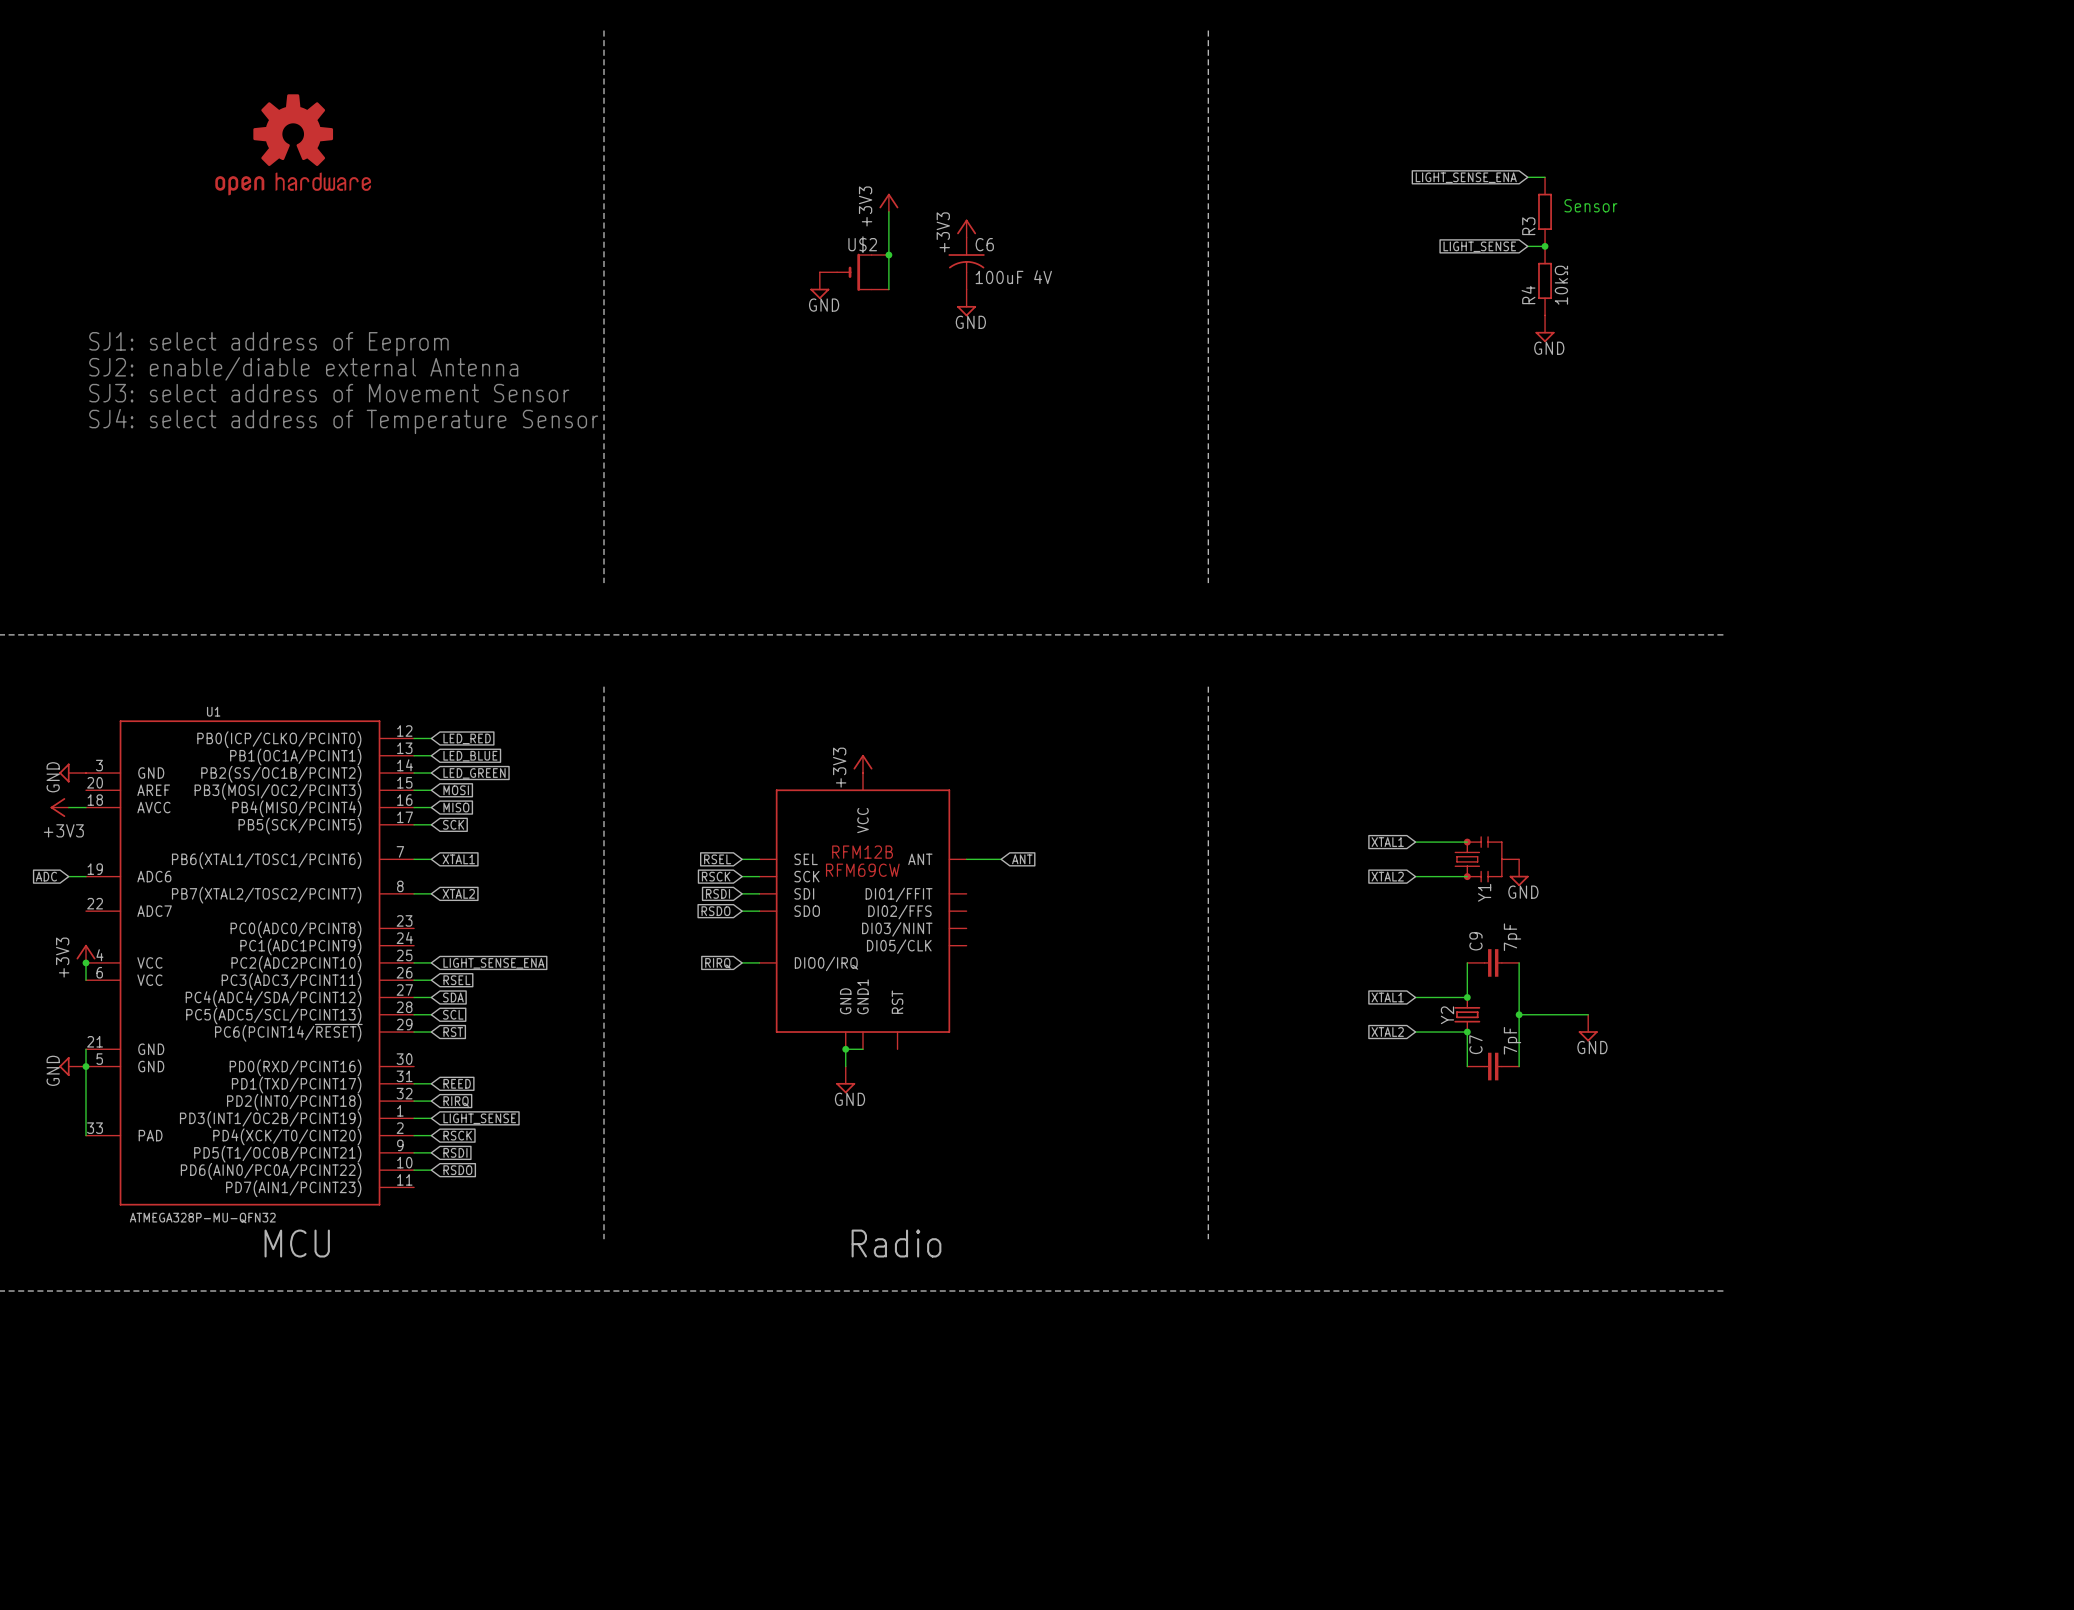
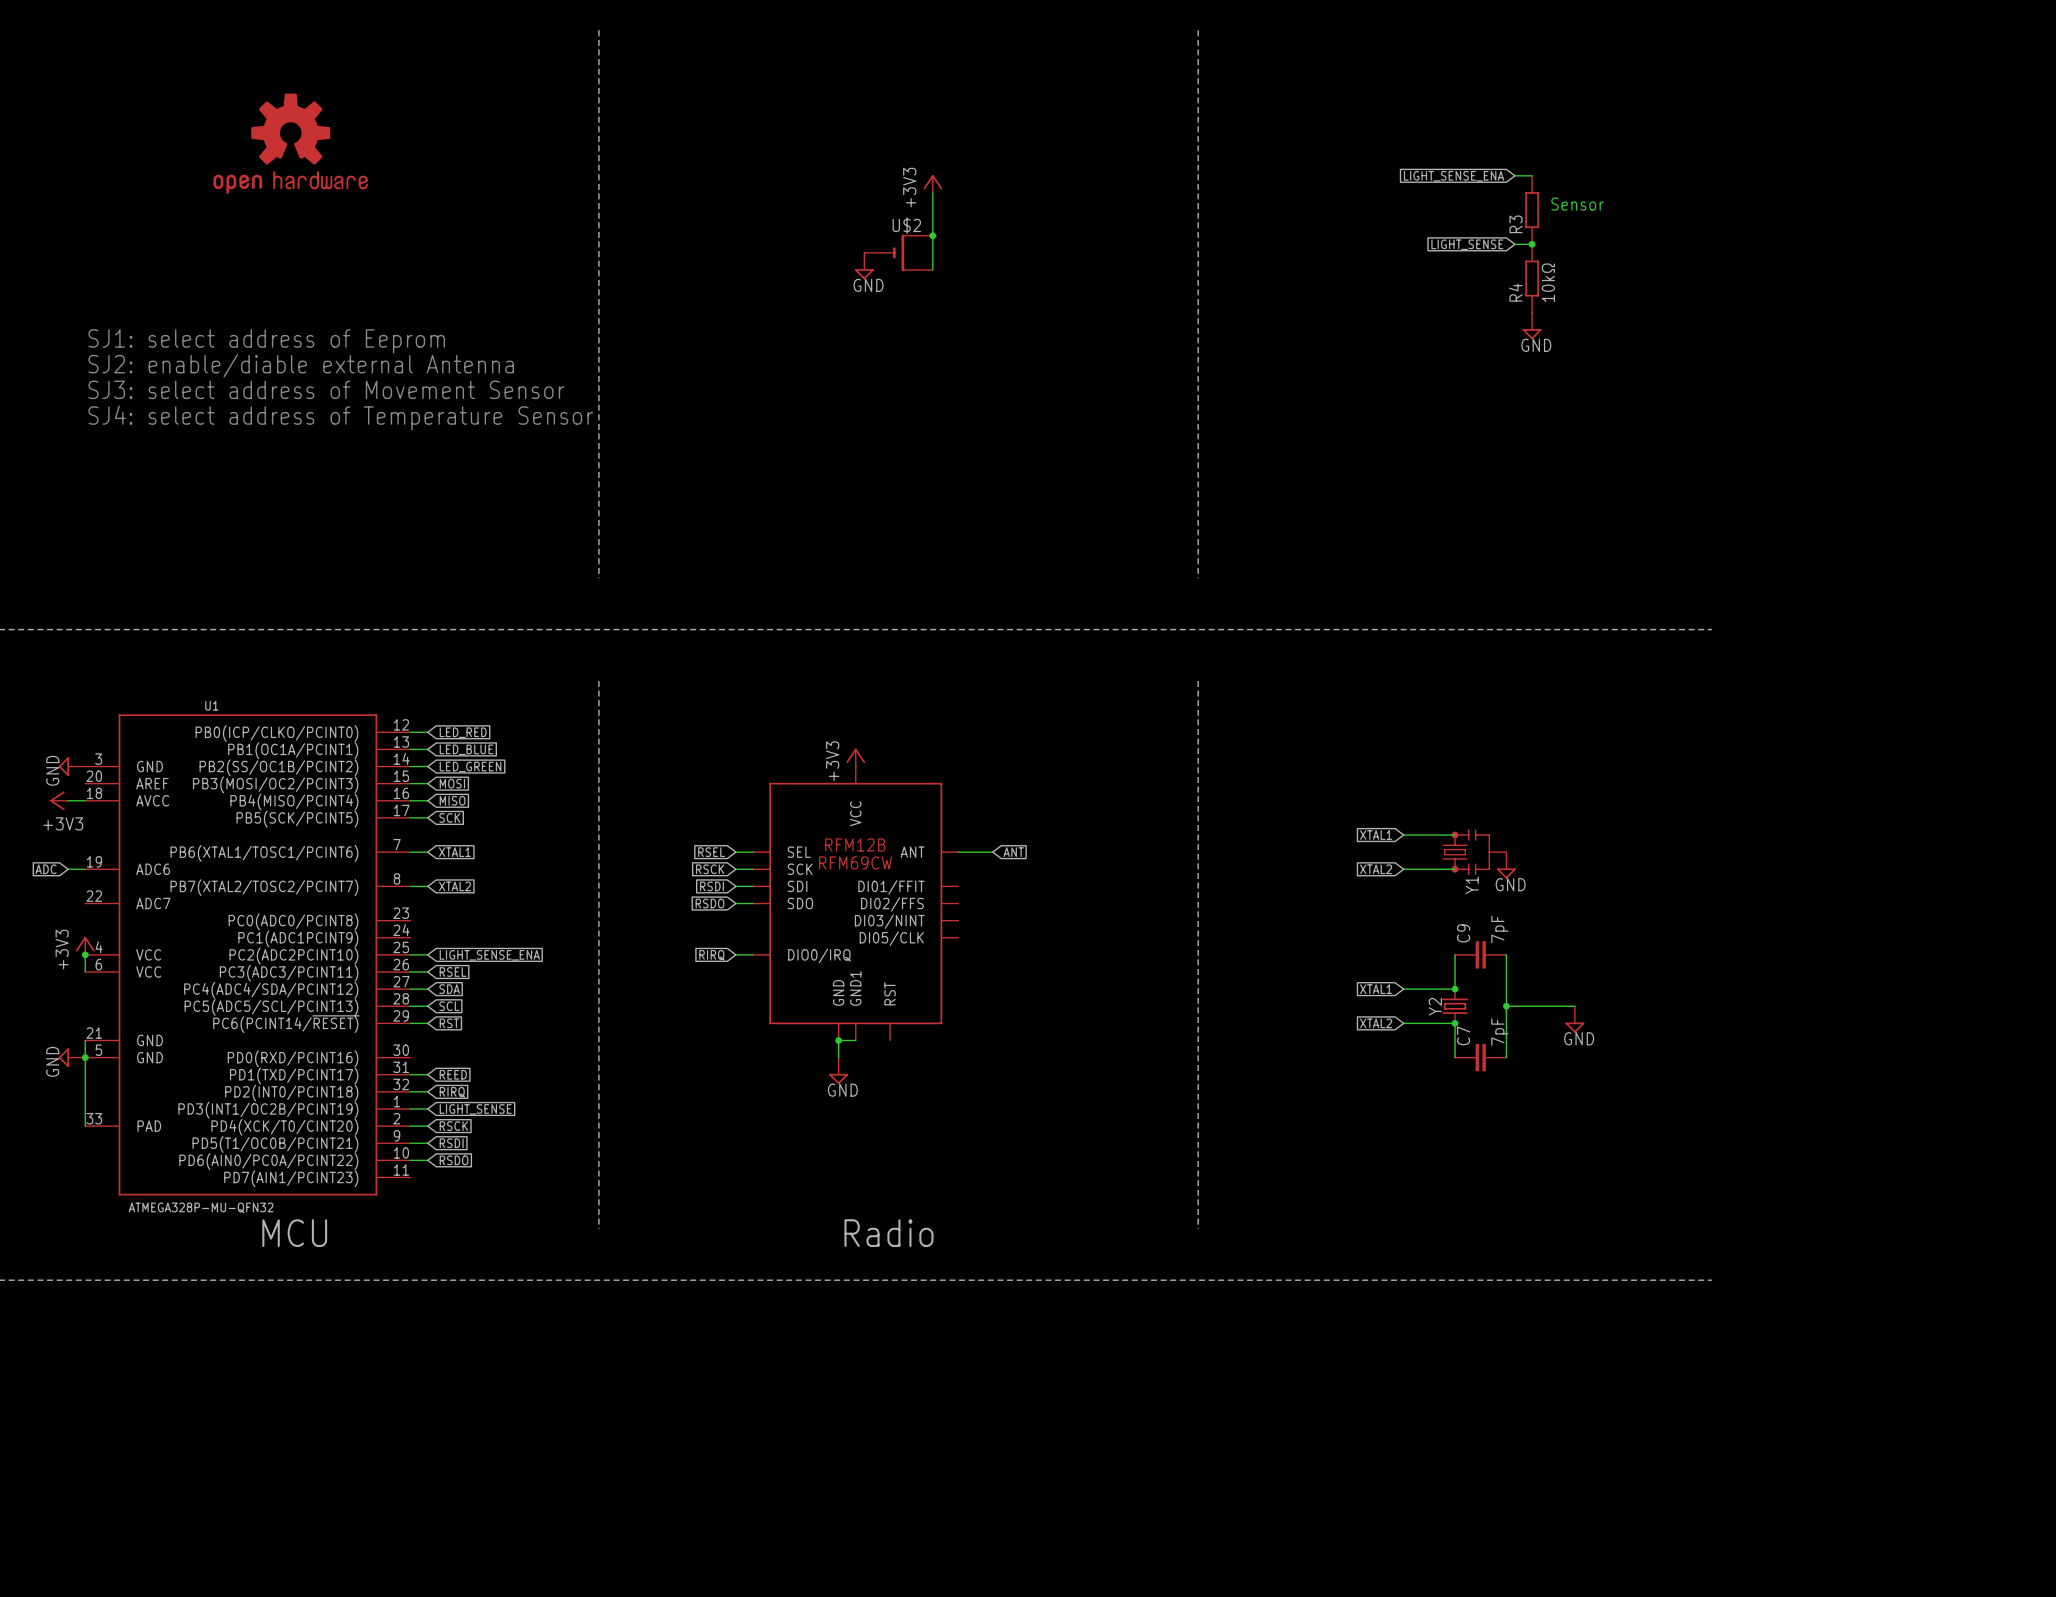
power symbol: none -> +3V3 (932, 183)
power symbol: +3V3 (888, 202) -> none
wire: (888, 211) (888, 289) -> (932, 192) (932, 270)
power symbol: +3V3 (966, 228) -> none
junction: none -> (932, 235)
junction: (888, 255) -> none
C6: 100uF 4V (966, 263) -> none
power symbol: none -> GND (864, 266)
U$2 position: (854, 272) -> (898, 252)
power symbol: GND (819, 285) -> none
power symbol: GND (966, 302) -> none

